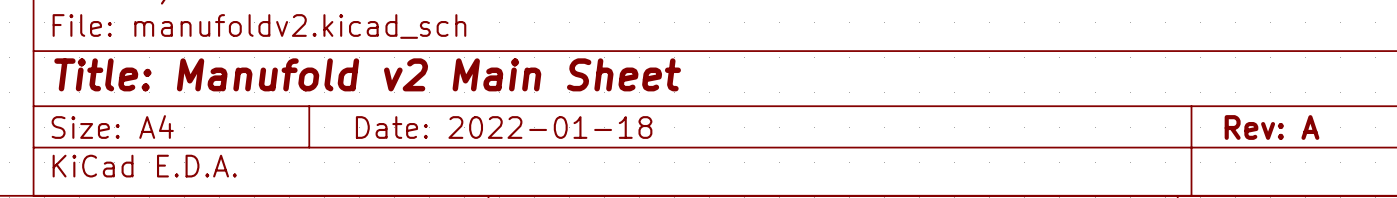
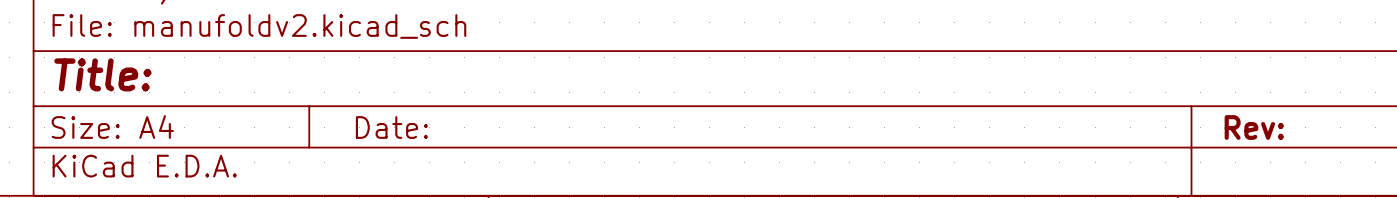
title block: Title: Manufold v2 Main Sheet (367, 74) -> Title: (102, 74)
title block: Date: 2022-01-18 (504, 127) -> Date: (391, 127)
title block: Rev: A (1272, 127) -> Rev: (1254, 127)

